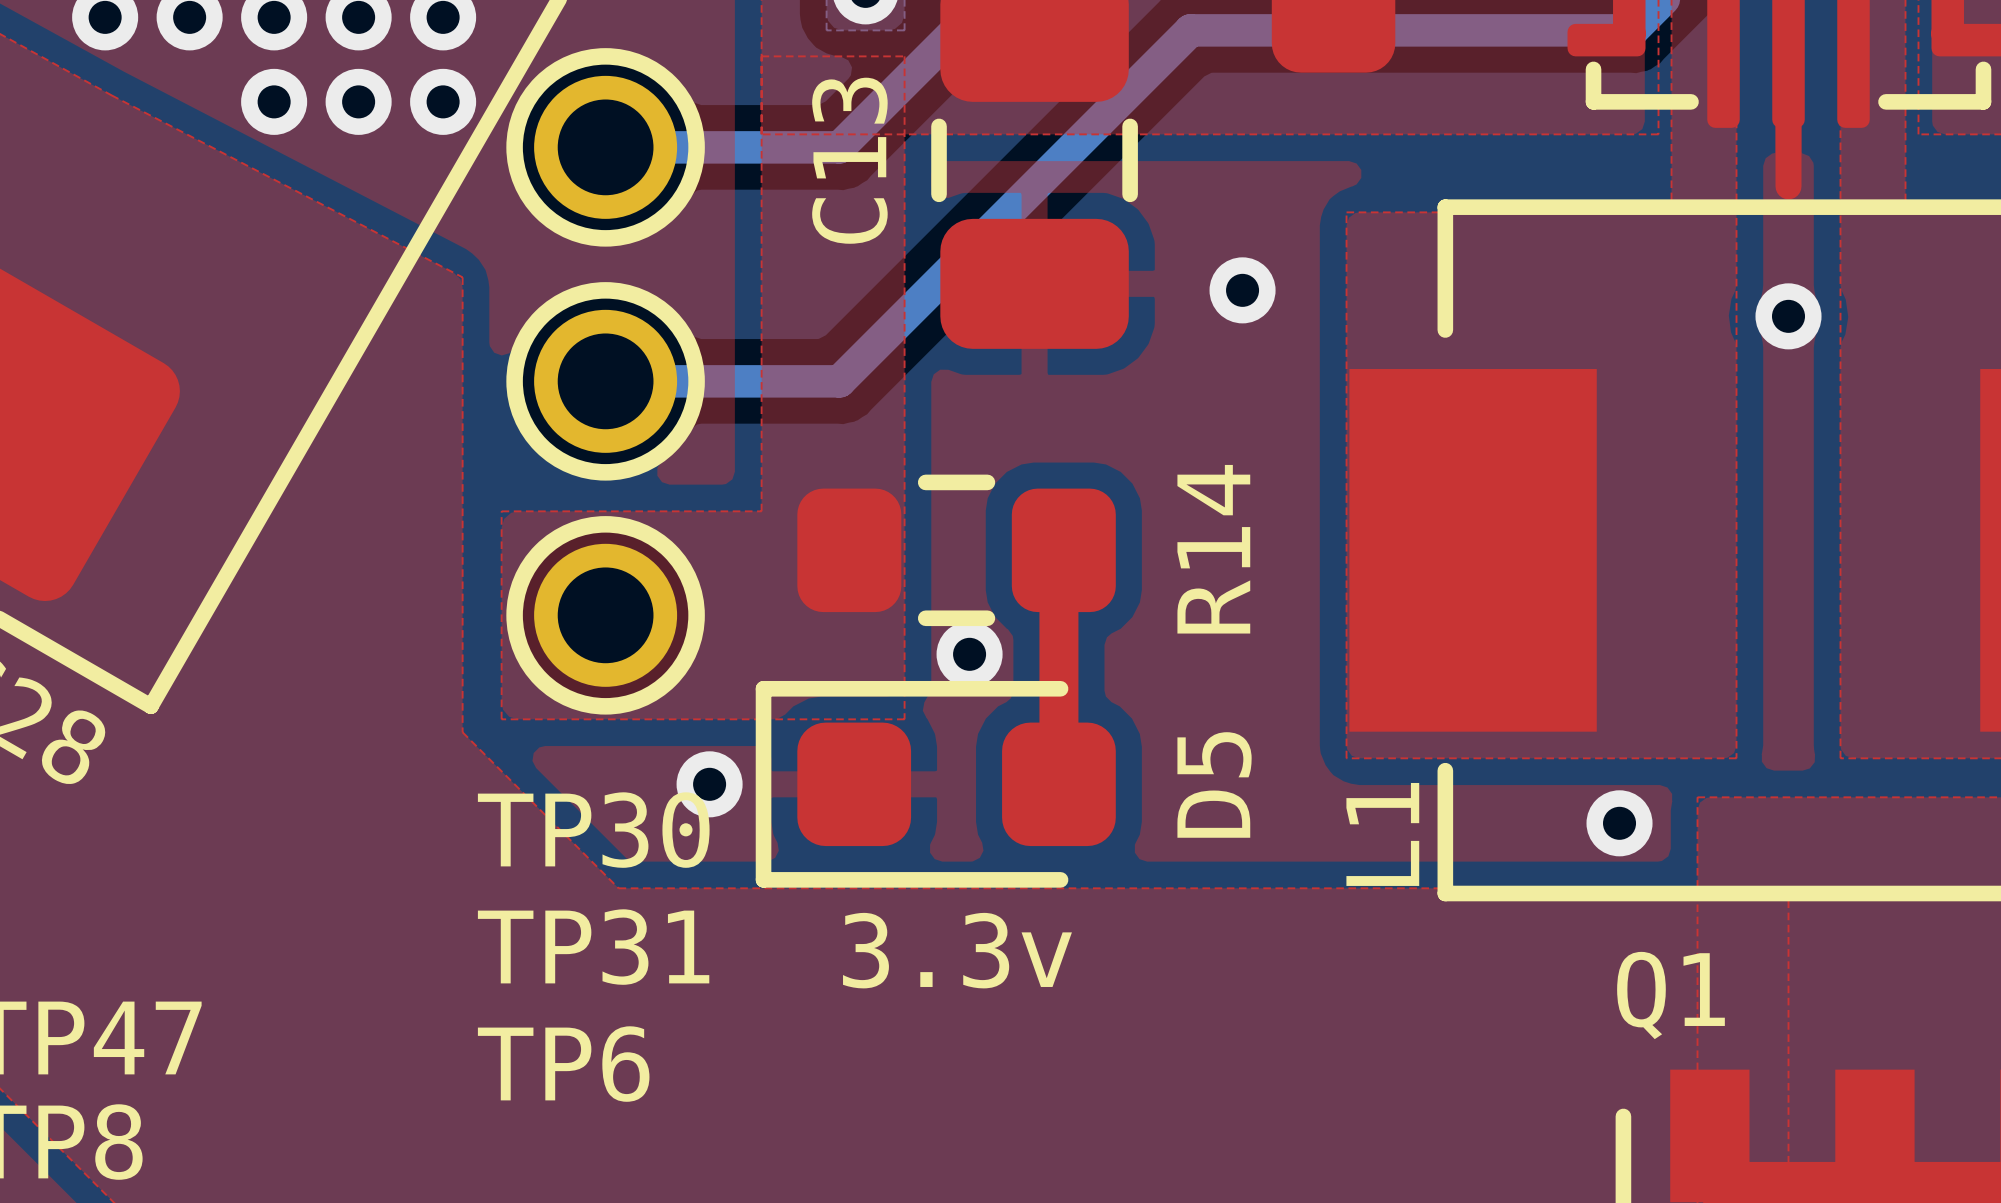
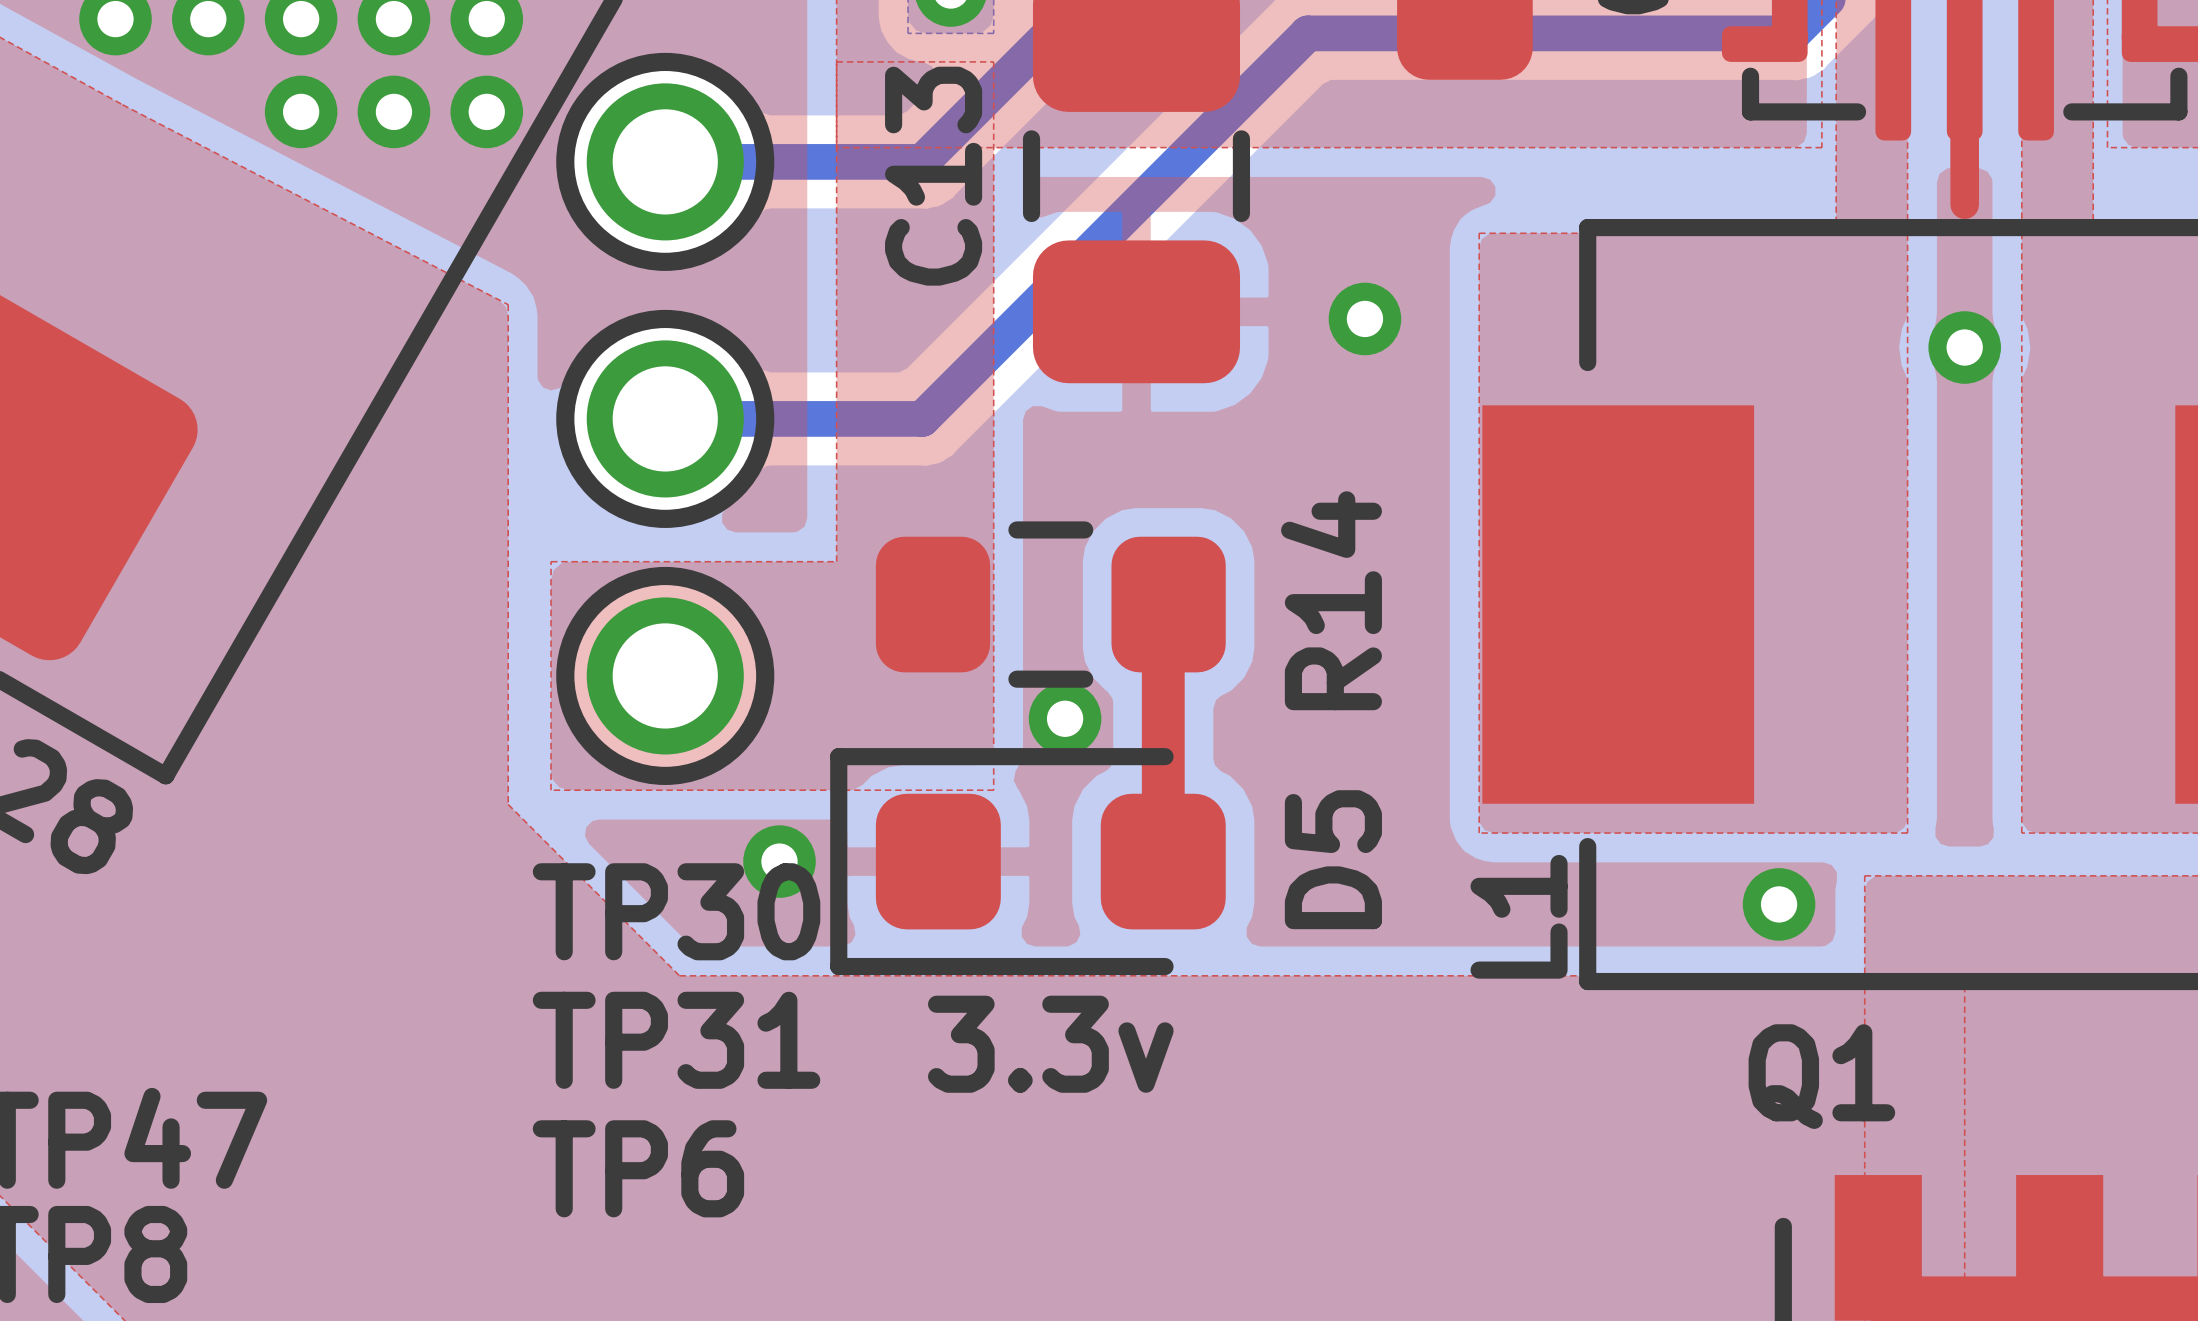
Q1 name position: Q1 (1670, 995) -> Q1 (1821, 1076)

